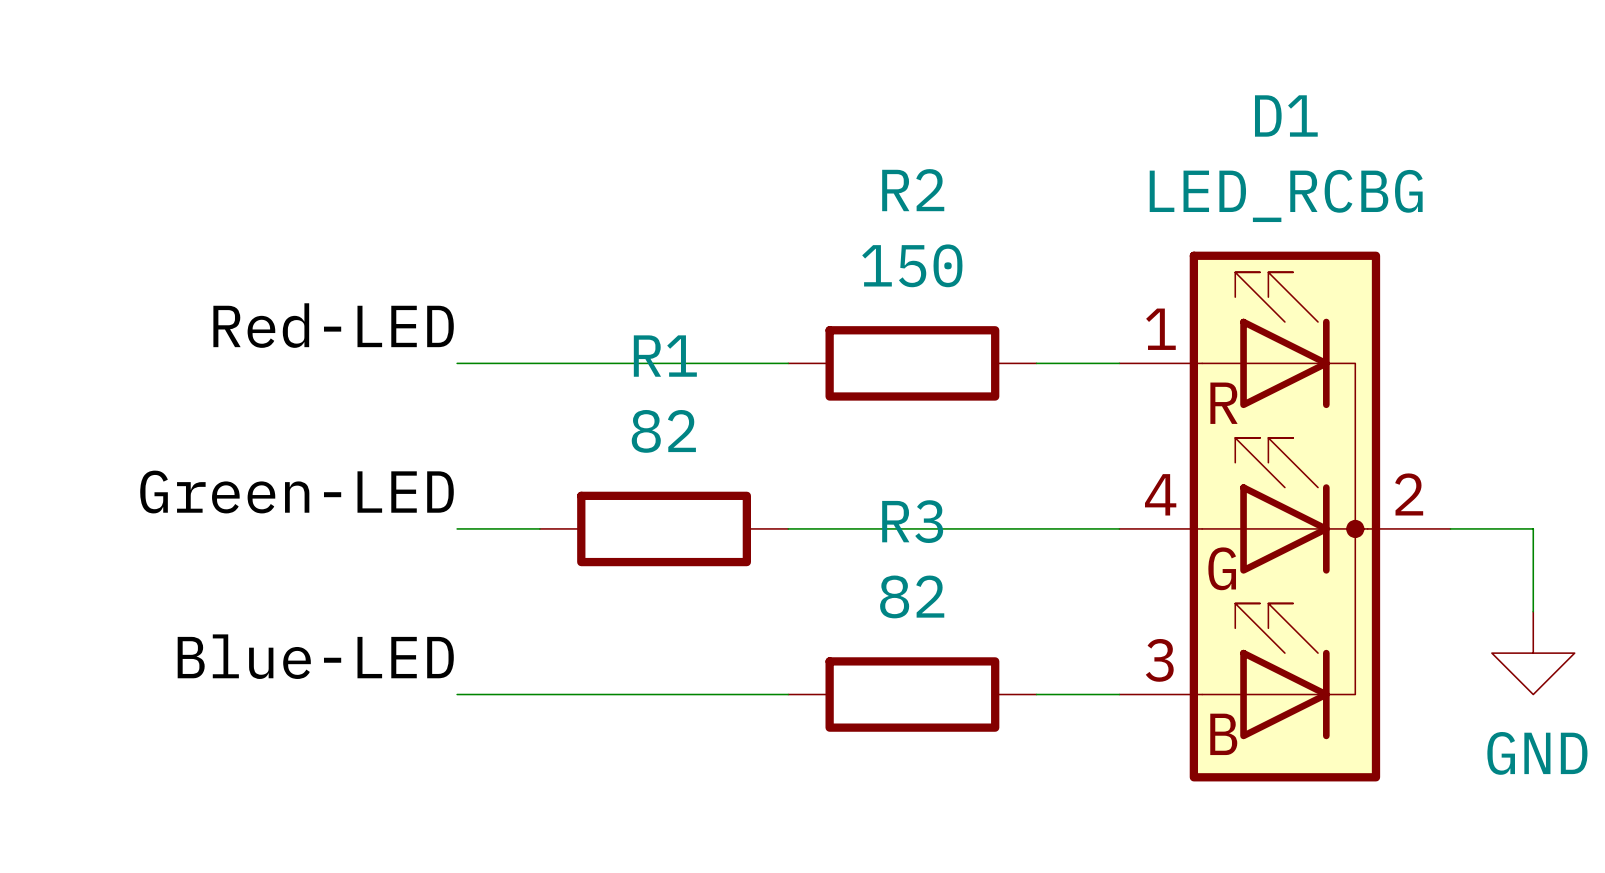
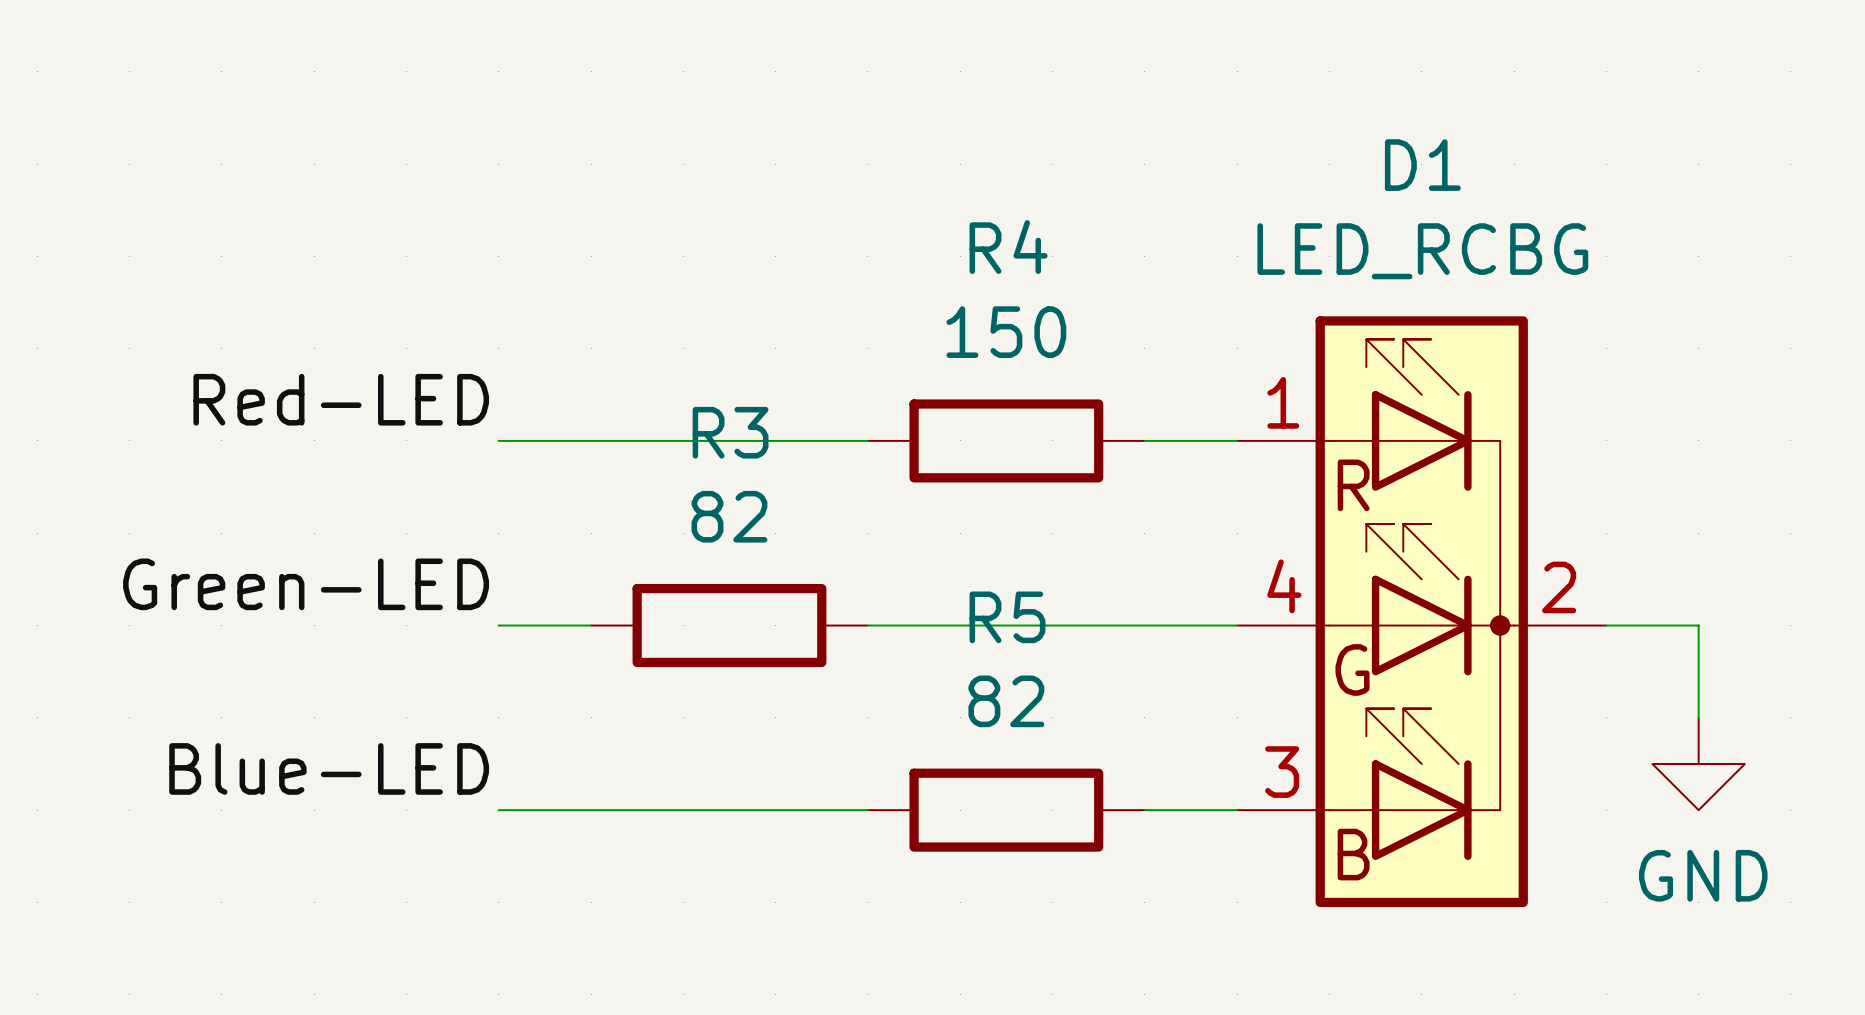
R2 name: R2 (913, 190) -> R4 (1008, 247)
R1 name: R1 (665, 356) -> R3 (730, 432)
R3 name: R3 (912, 521) -> R5 (1007, 617)

